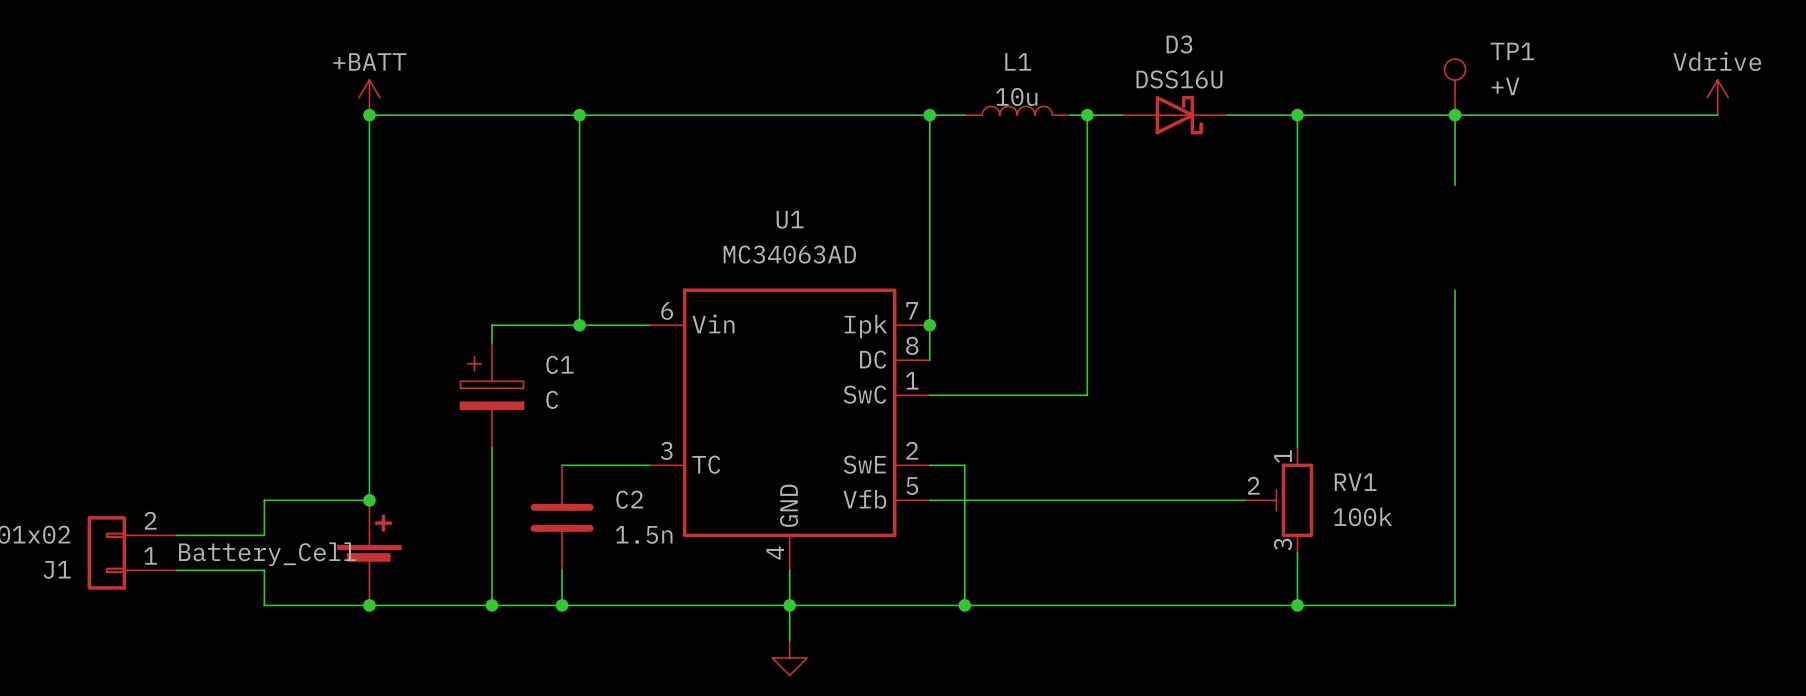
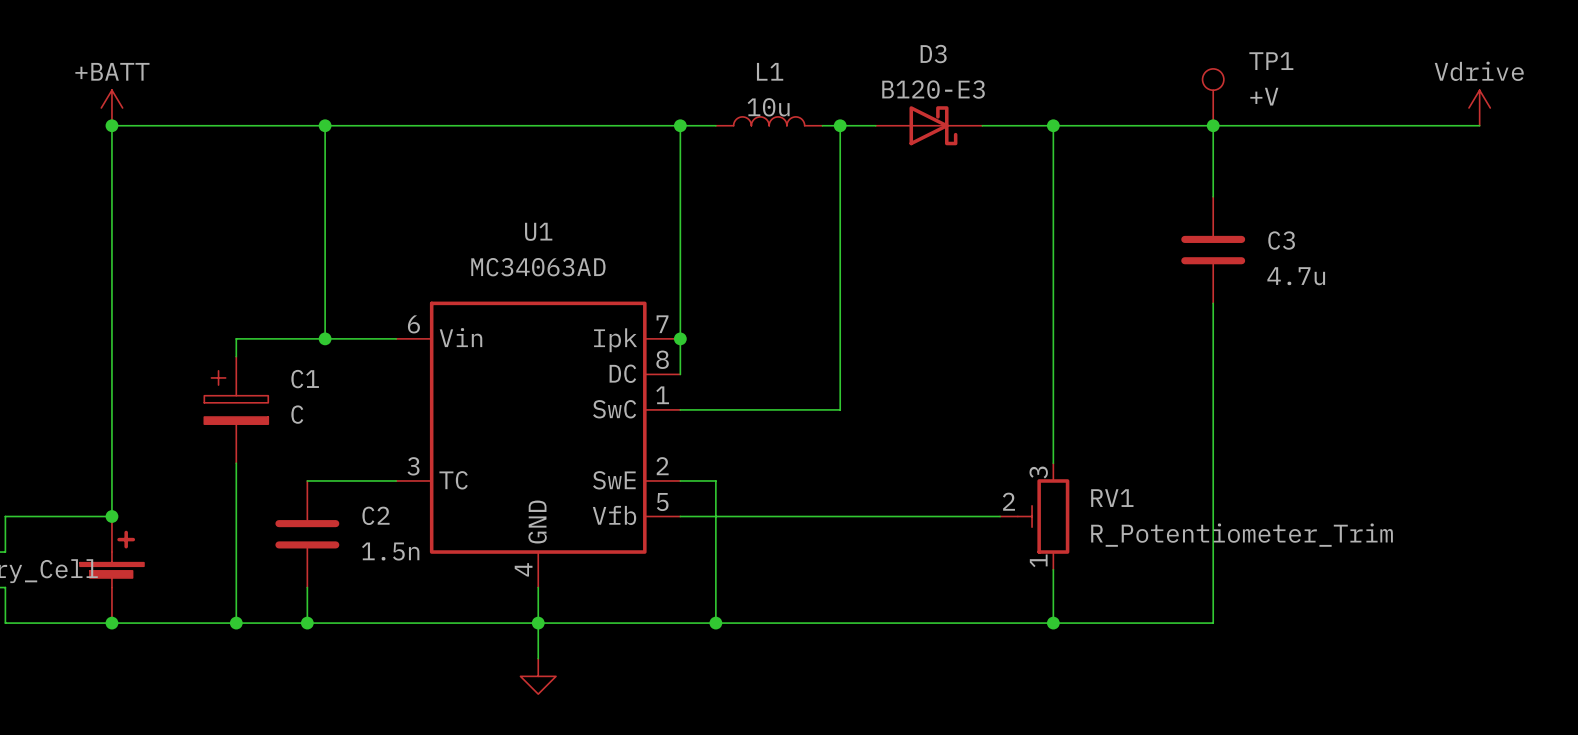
D3 value: DSS16U (1179, 79) -> B120-E3 (933, 89)
C3: none -> 4.7u (1213, 250)
RV1 flip: as is (1287, 500) -> up-down (1043, 516)
RV1 value: 100k (1362, 516) -> R_Potentiometer_Trim (1242, 535)

